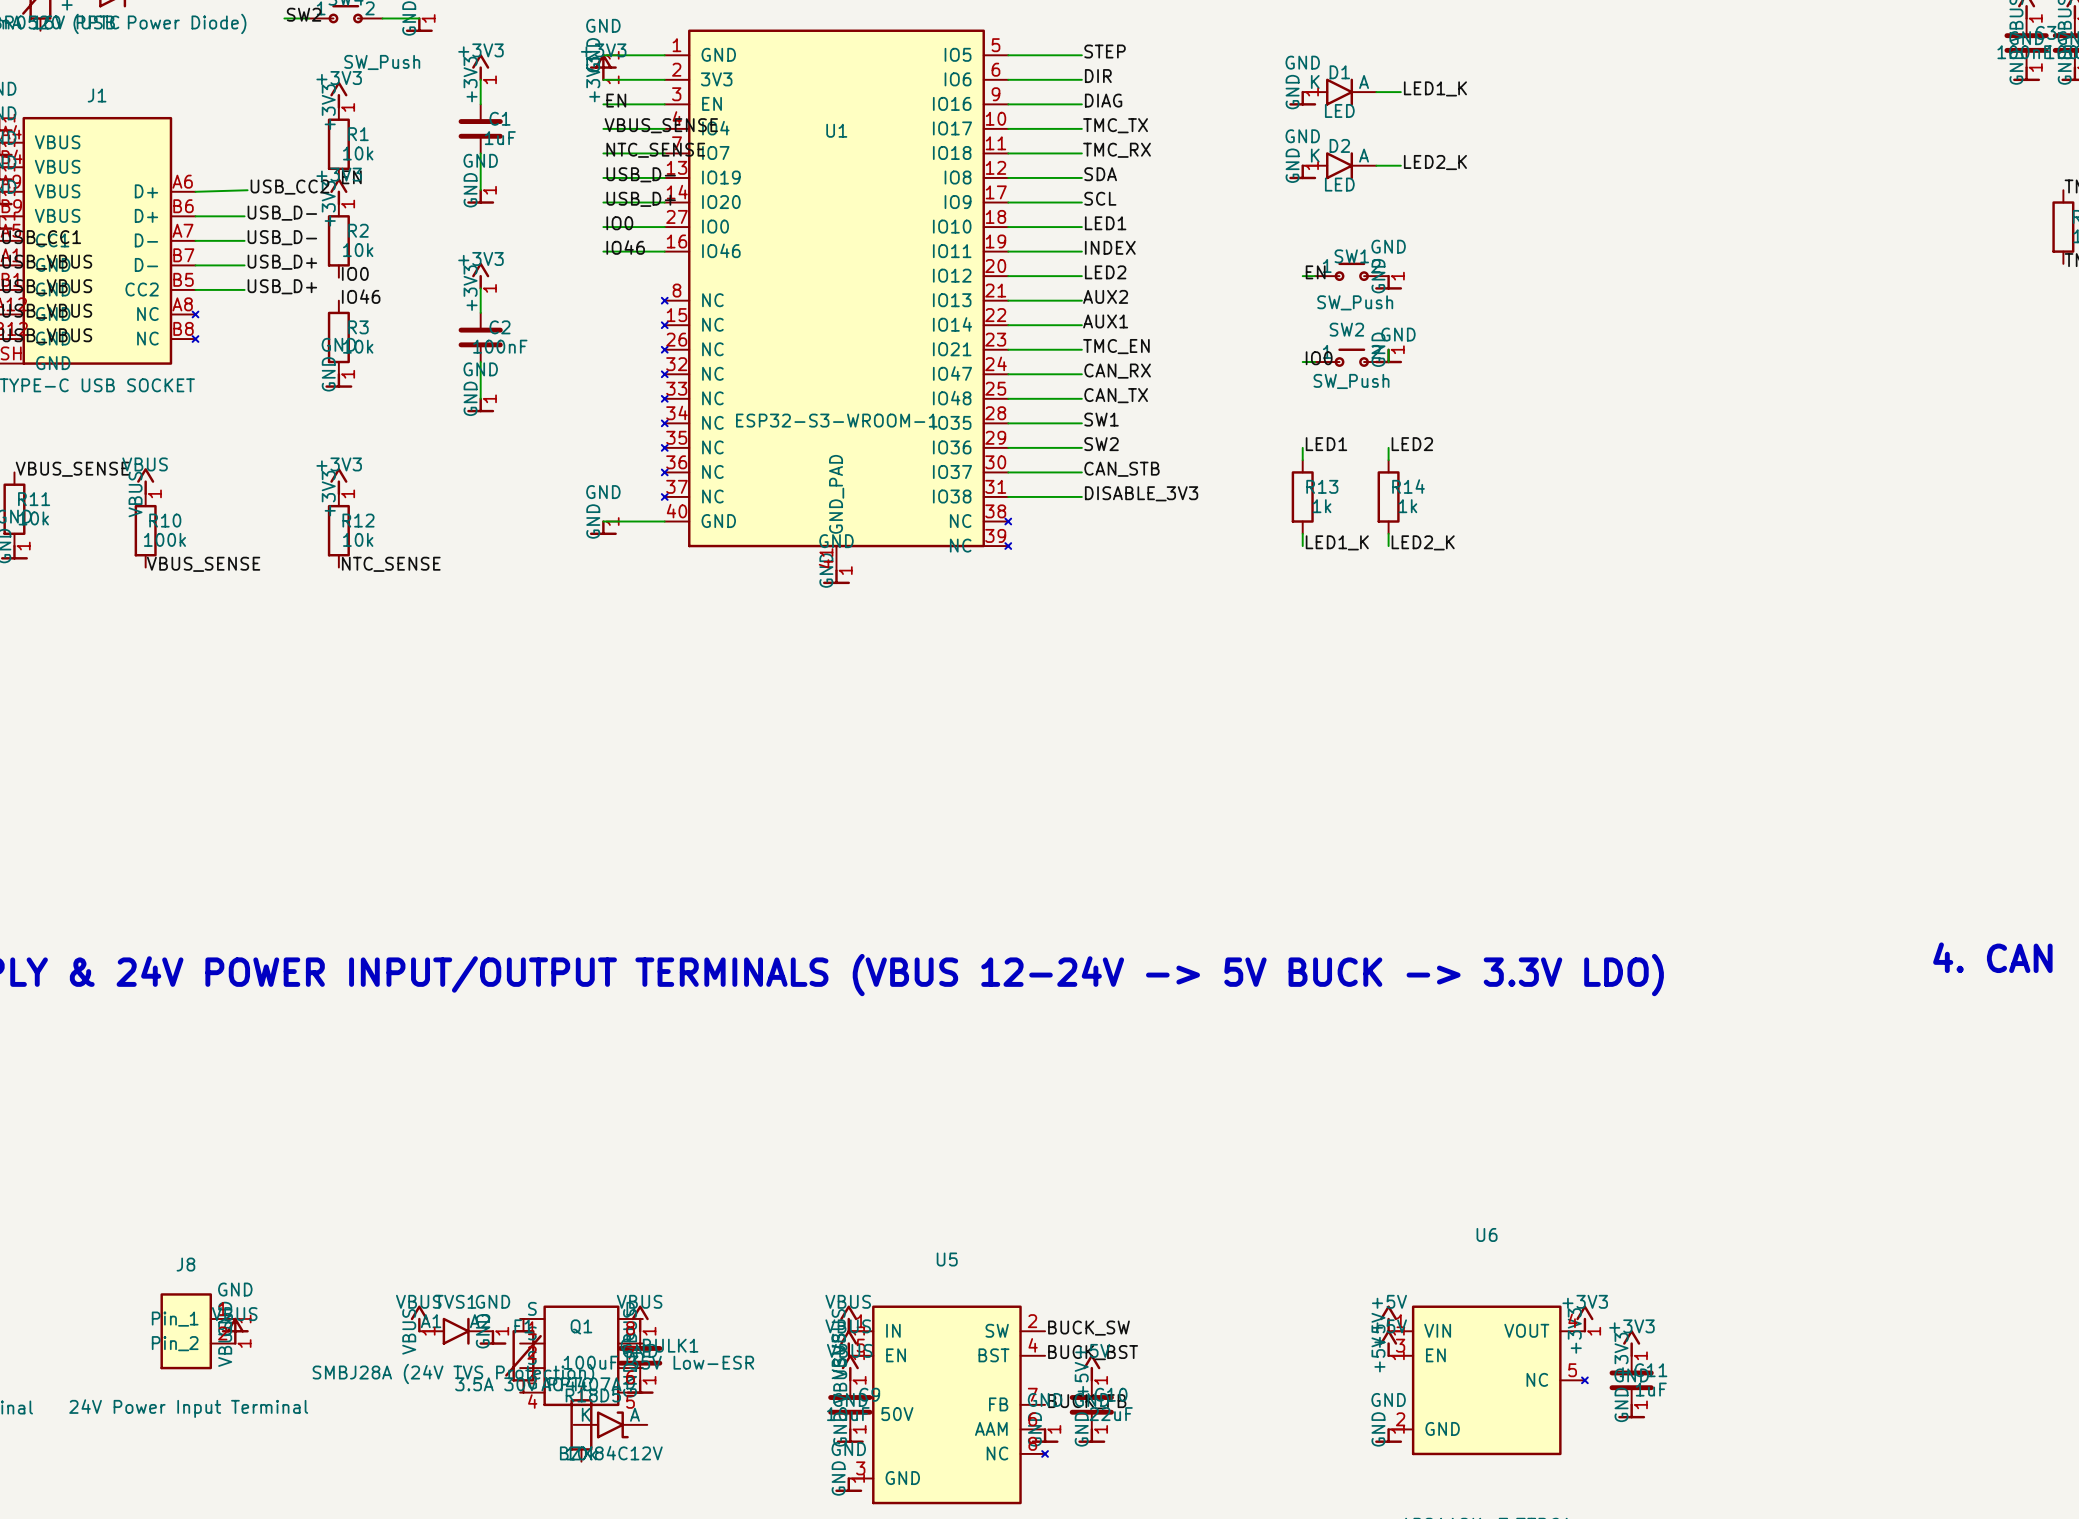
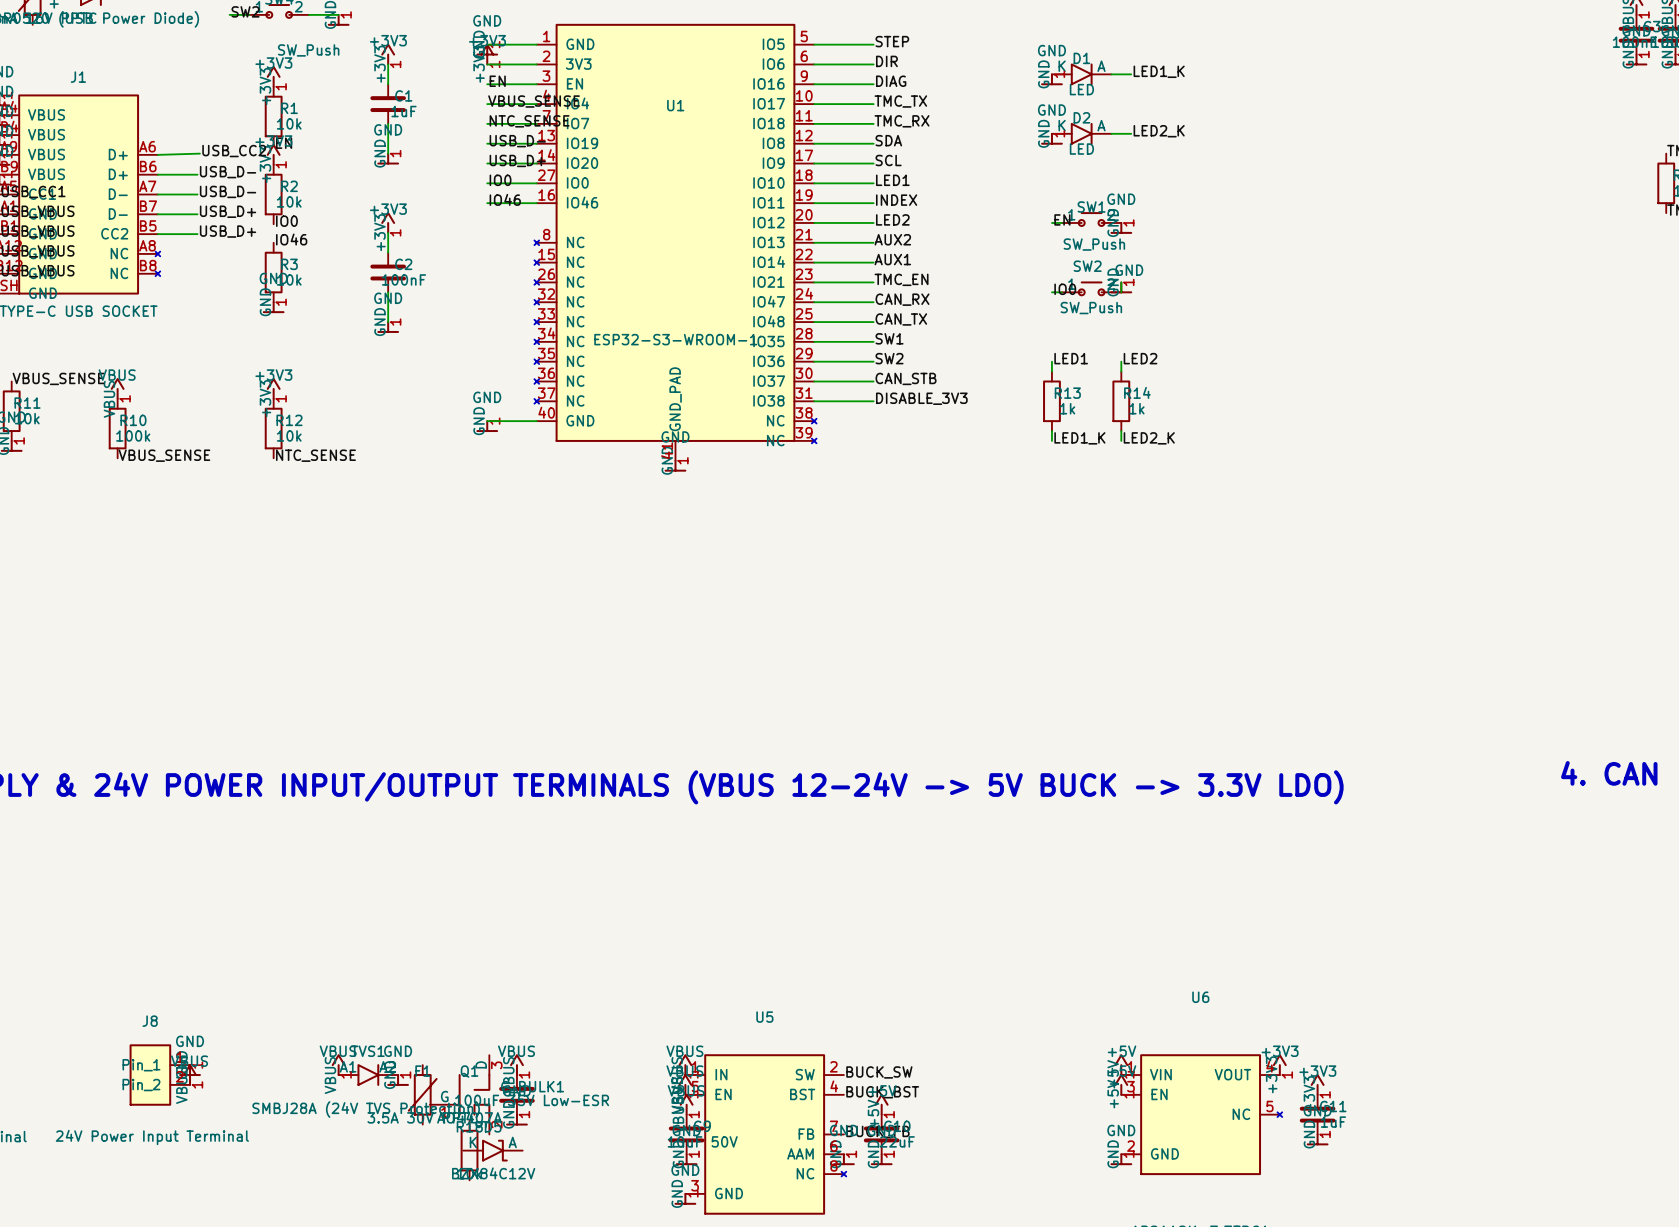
Q1 symbol: [520, 1305, 643, 1407] -> [429, 1055, 491, 1135]

